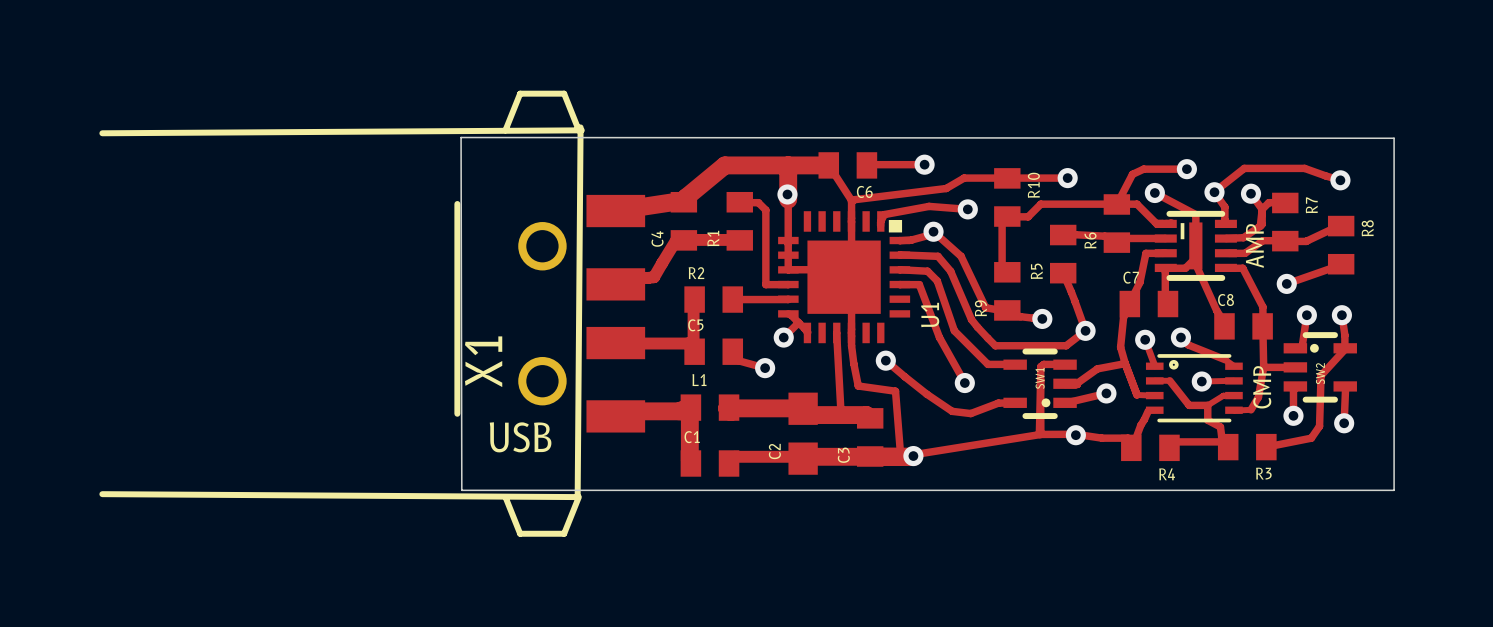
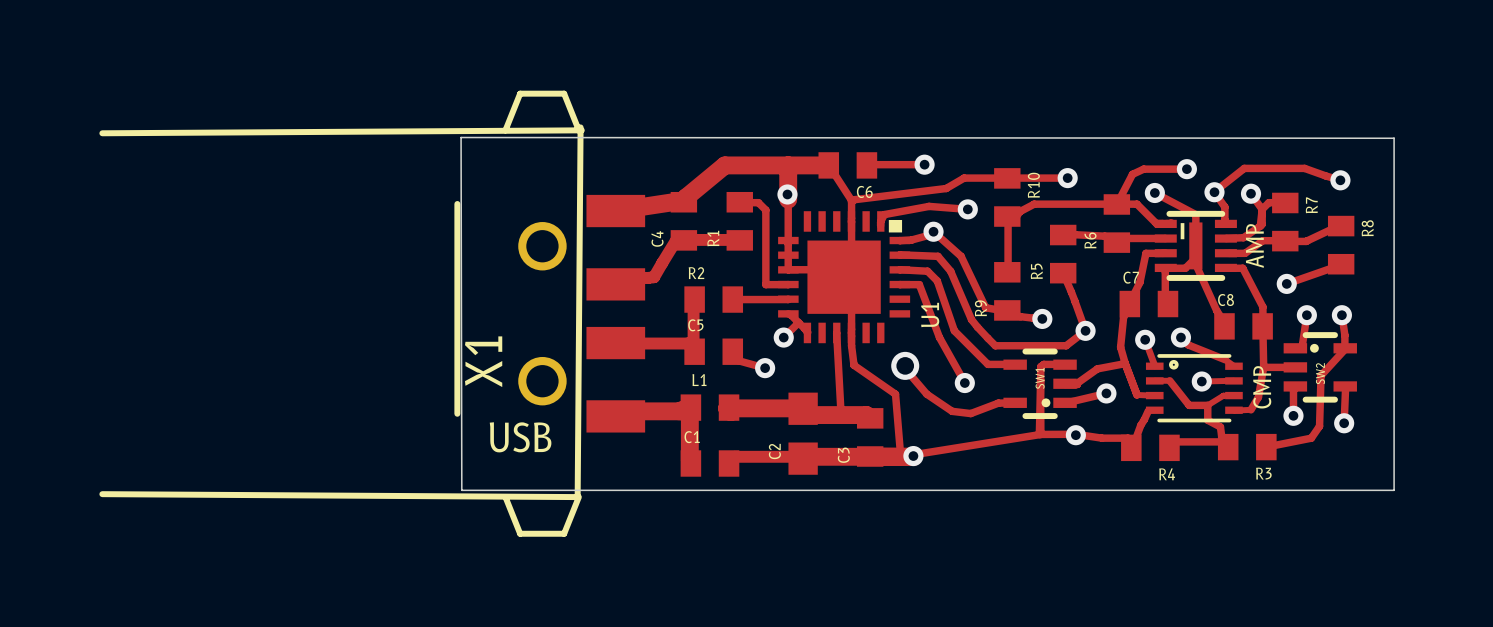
track: (1040, 204) (1028, 216) (1007, 216) -> (1040, 204) (1034, 204) (1019, 211) (1012, 222) (1005, 215) (1008, 218) (1008, 272) (1005, 275) (1009, 275)
track: (1007, 216) (1002, 217) (1002, 271) (1007, 271) -> none
track: (885, 360) (926, 394) -> (905, 365) (926, 394)
via position: (885, 360) -> (905, 365)
track: (853, 363) (858, 386) (895, 391) (900, 456) -> (853, 363) (895, 394) (900, 456)

